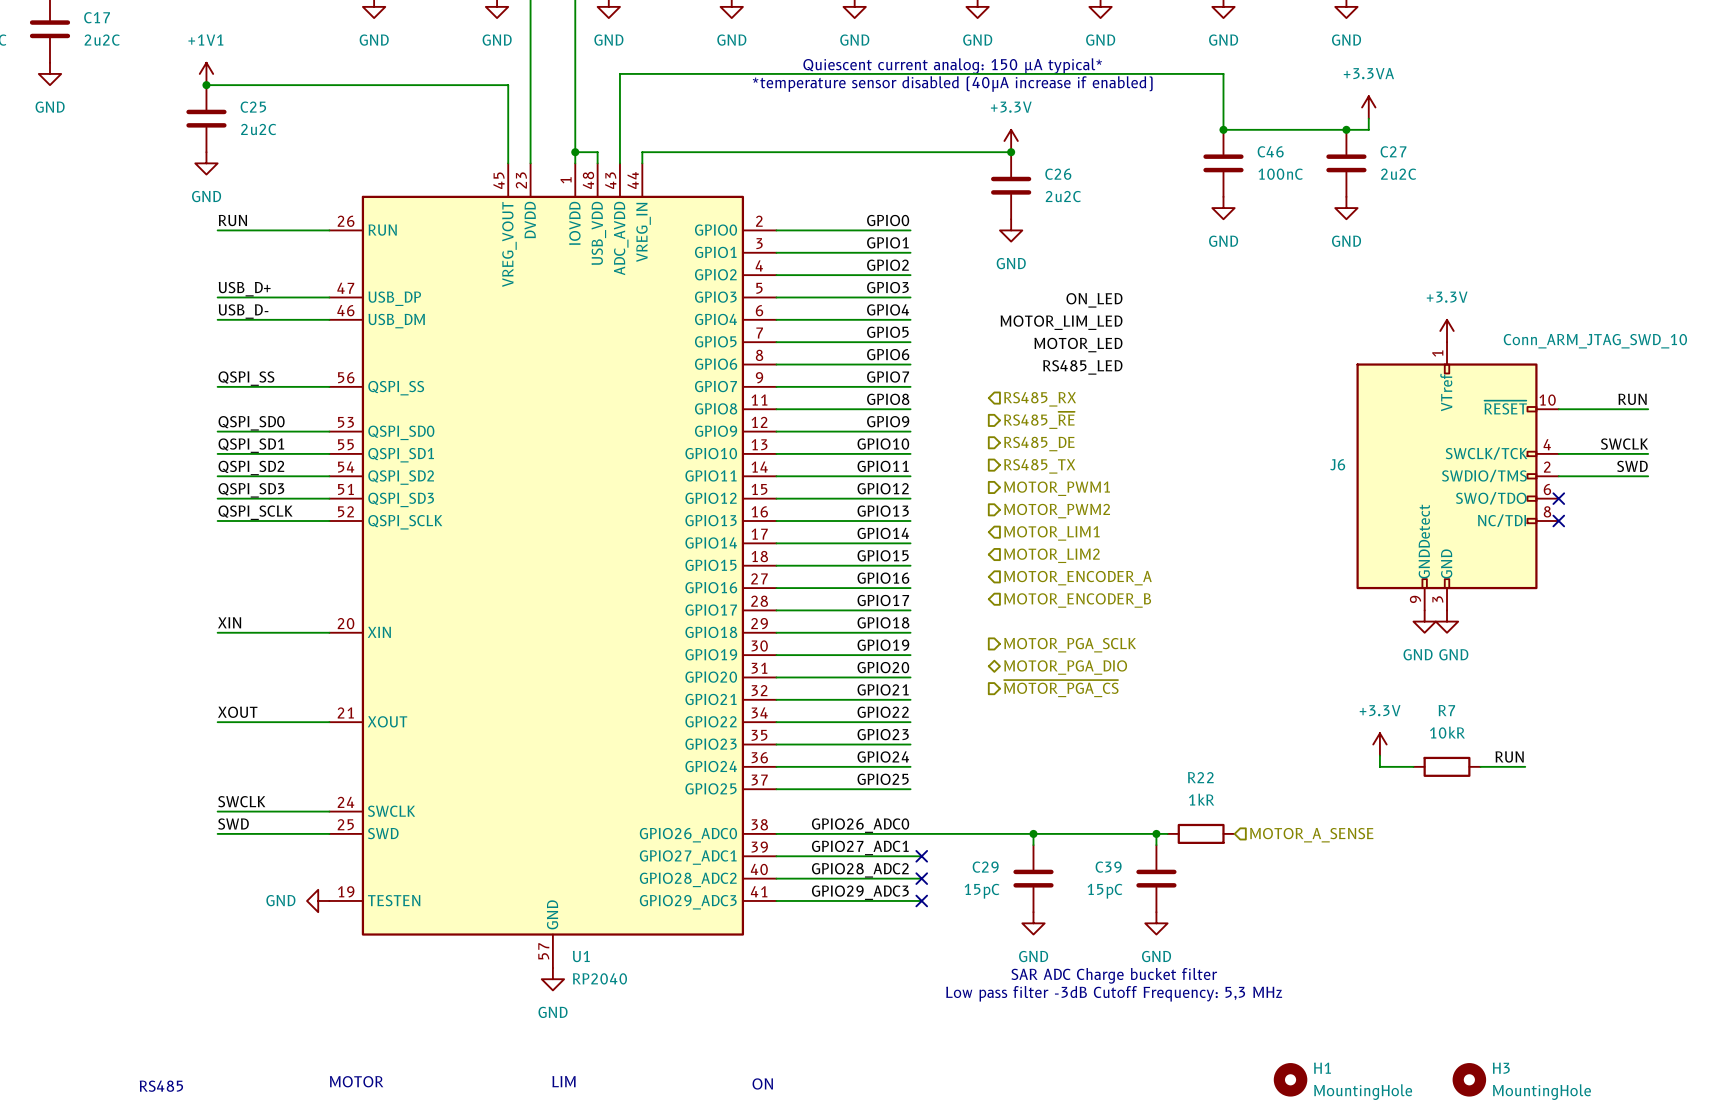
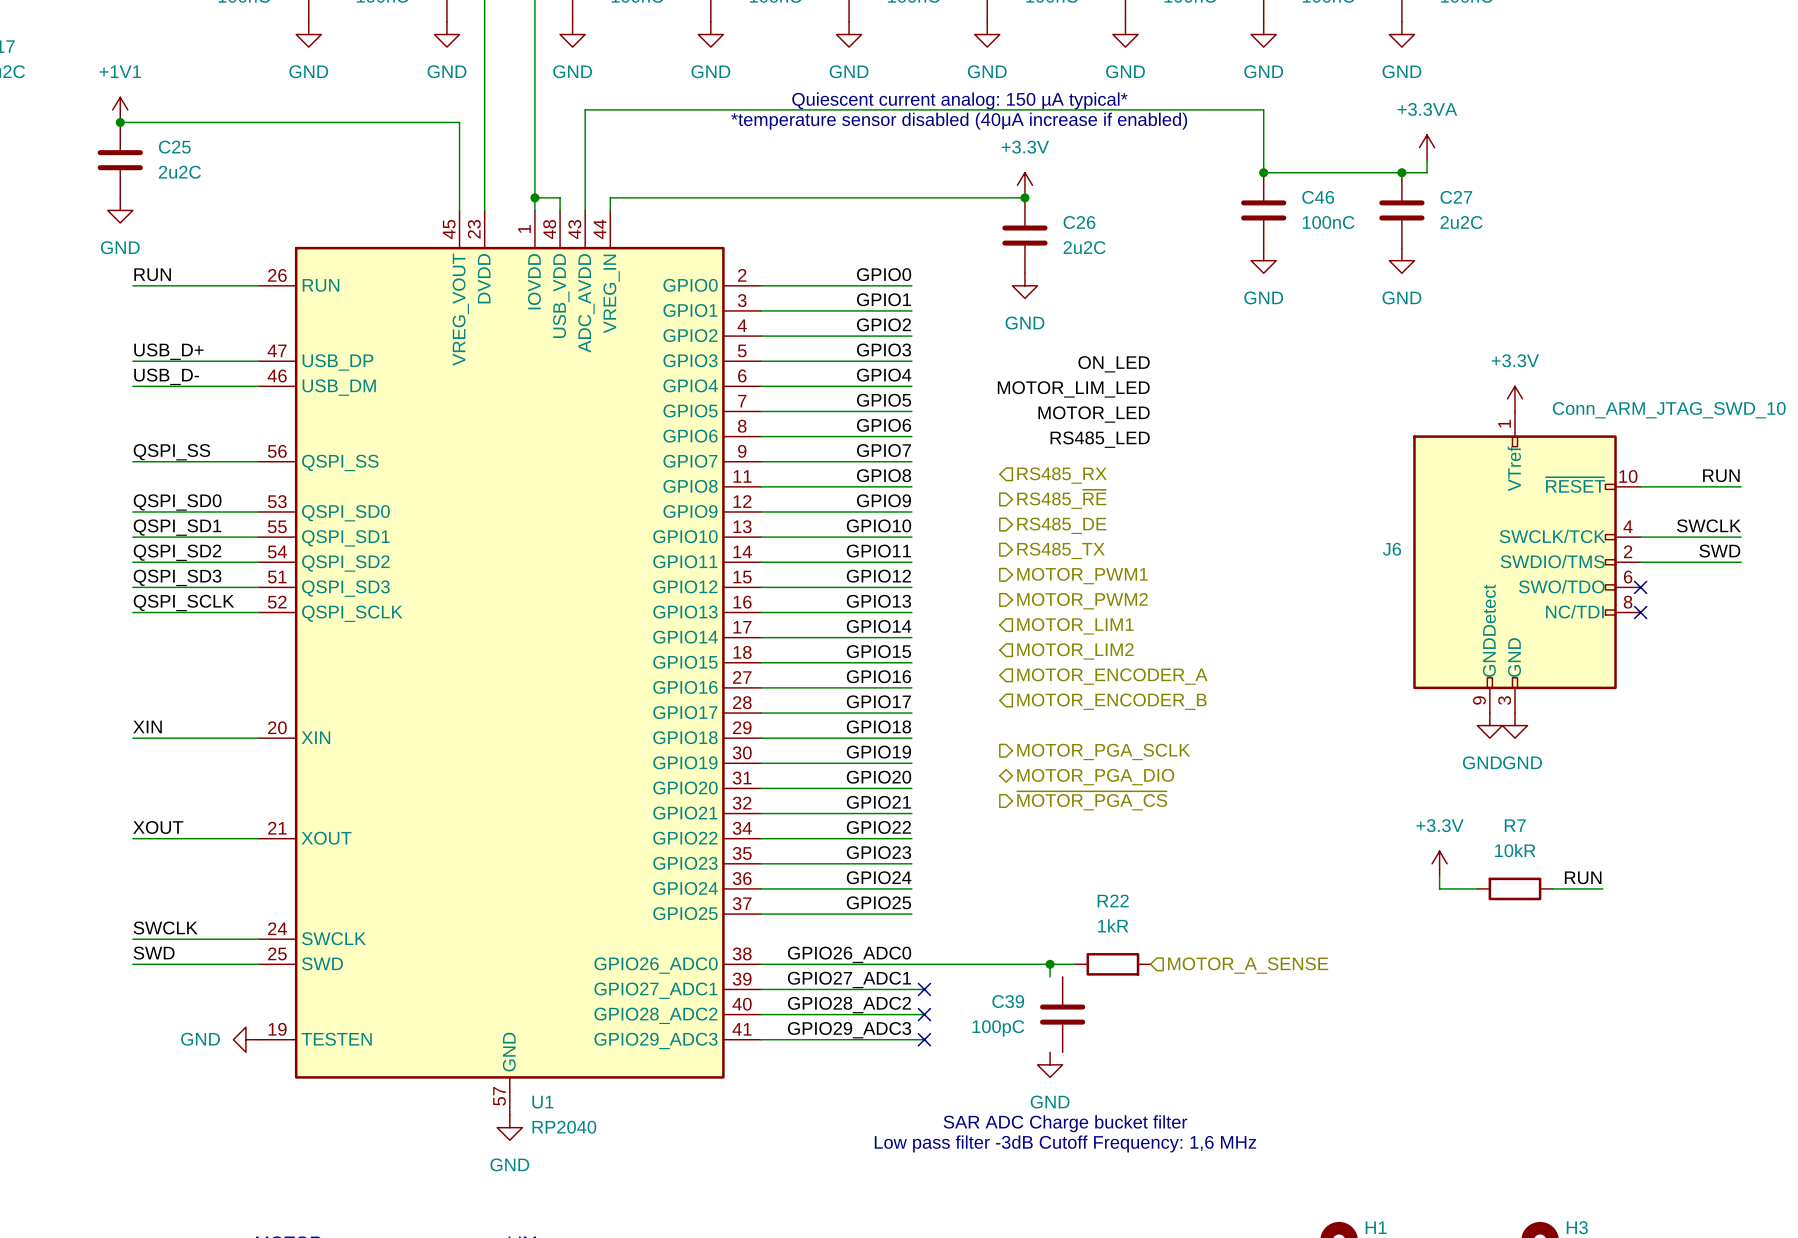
wire: (1055, 833) (1167, 833) -> none
wire: (1156, 833) (1156, 845) -> none
junction: (1156, 833) -> none
R22 position: (1201, 833) -> (1112, 964)
hierarchical label position: MOTOR_A_SENSE (1311, 835) -> MOTOR_A_SENSE (1248, 965)
C29: 15pC (1033, 878) -> none
C39 position: (1156, 878) -> (1062, 1014)
C39 value: 15pC (1104, 891) -> 100pC (998, 1028)
power symbol: GND (1156, 923) -> none
text position: SAR ADC Charge bucket filter (1114, 975) -> SAR ADC Charge bucket filter (1065, 1123)
text: Low pass filter -3dB Cutoff Frequency: 5,3 MHz (1114, 993) -> Low pass filter -3dB Cutoff Frequency: 1,6 MHz (1065, 1143)

